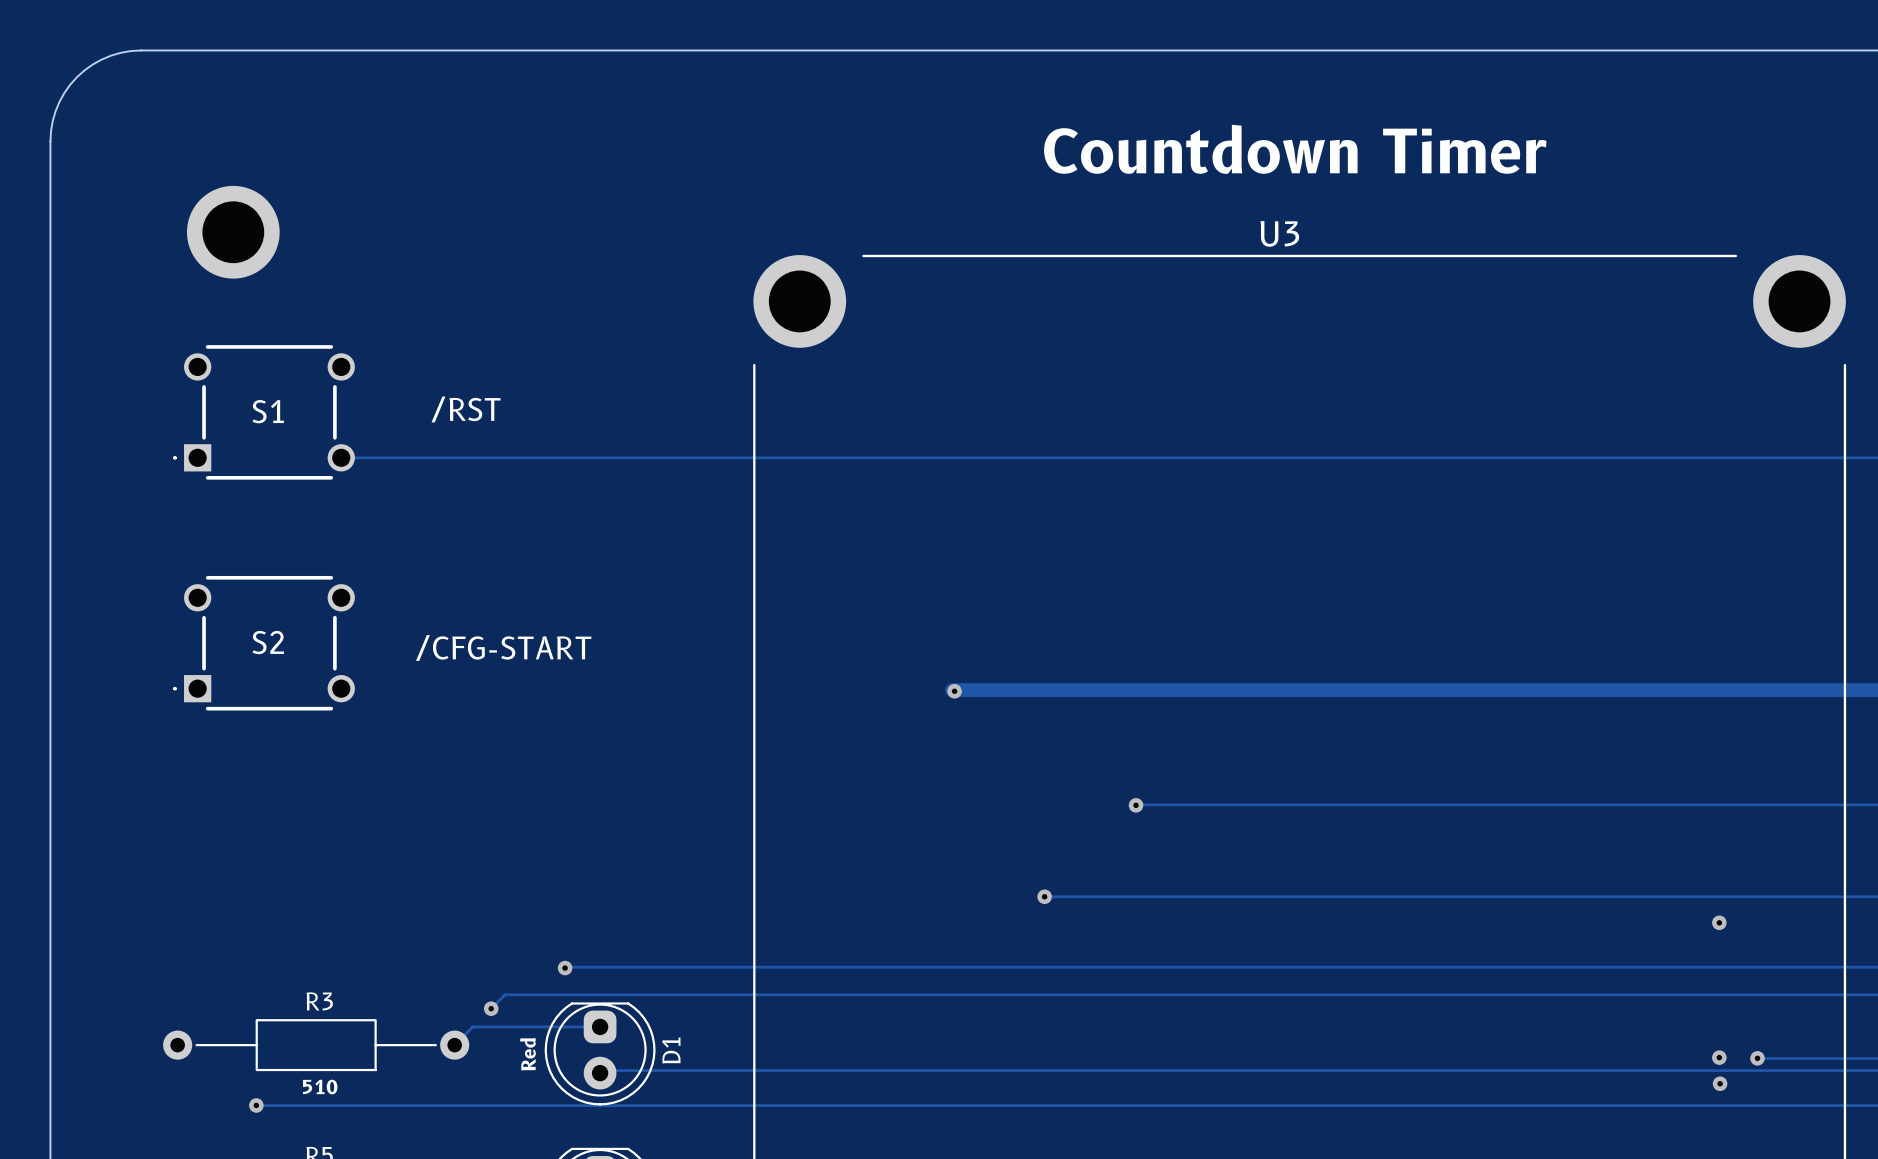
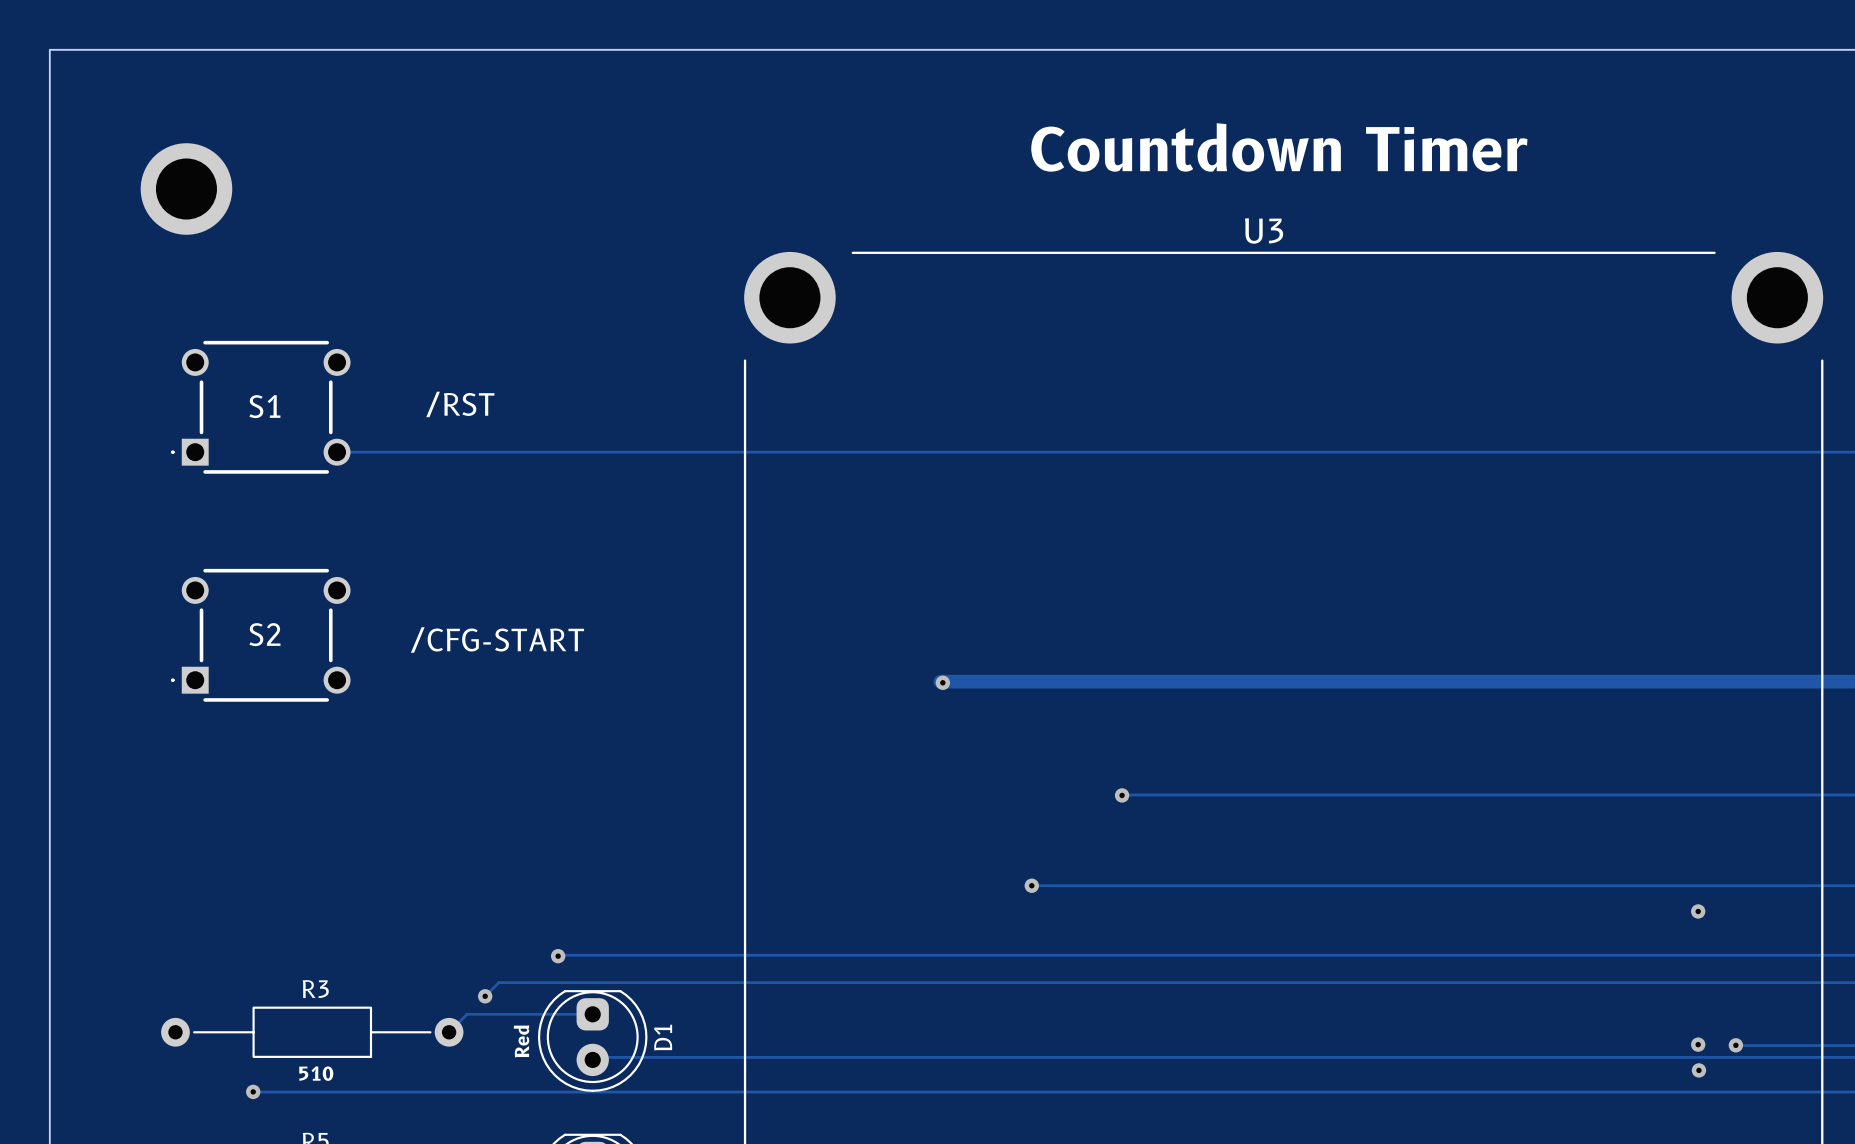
board edge: (141, 50) (121, 52) (101, 59) (77, 77) (64, 92) (55, 111) (50, 141) -> (139, 49) (49, 49) (49, 139)
part position: (233, 232) -> (186, 189)

